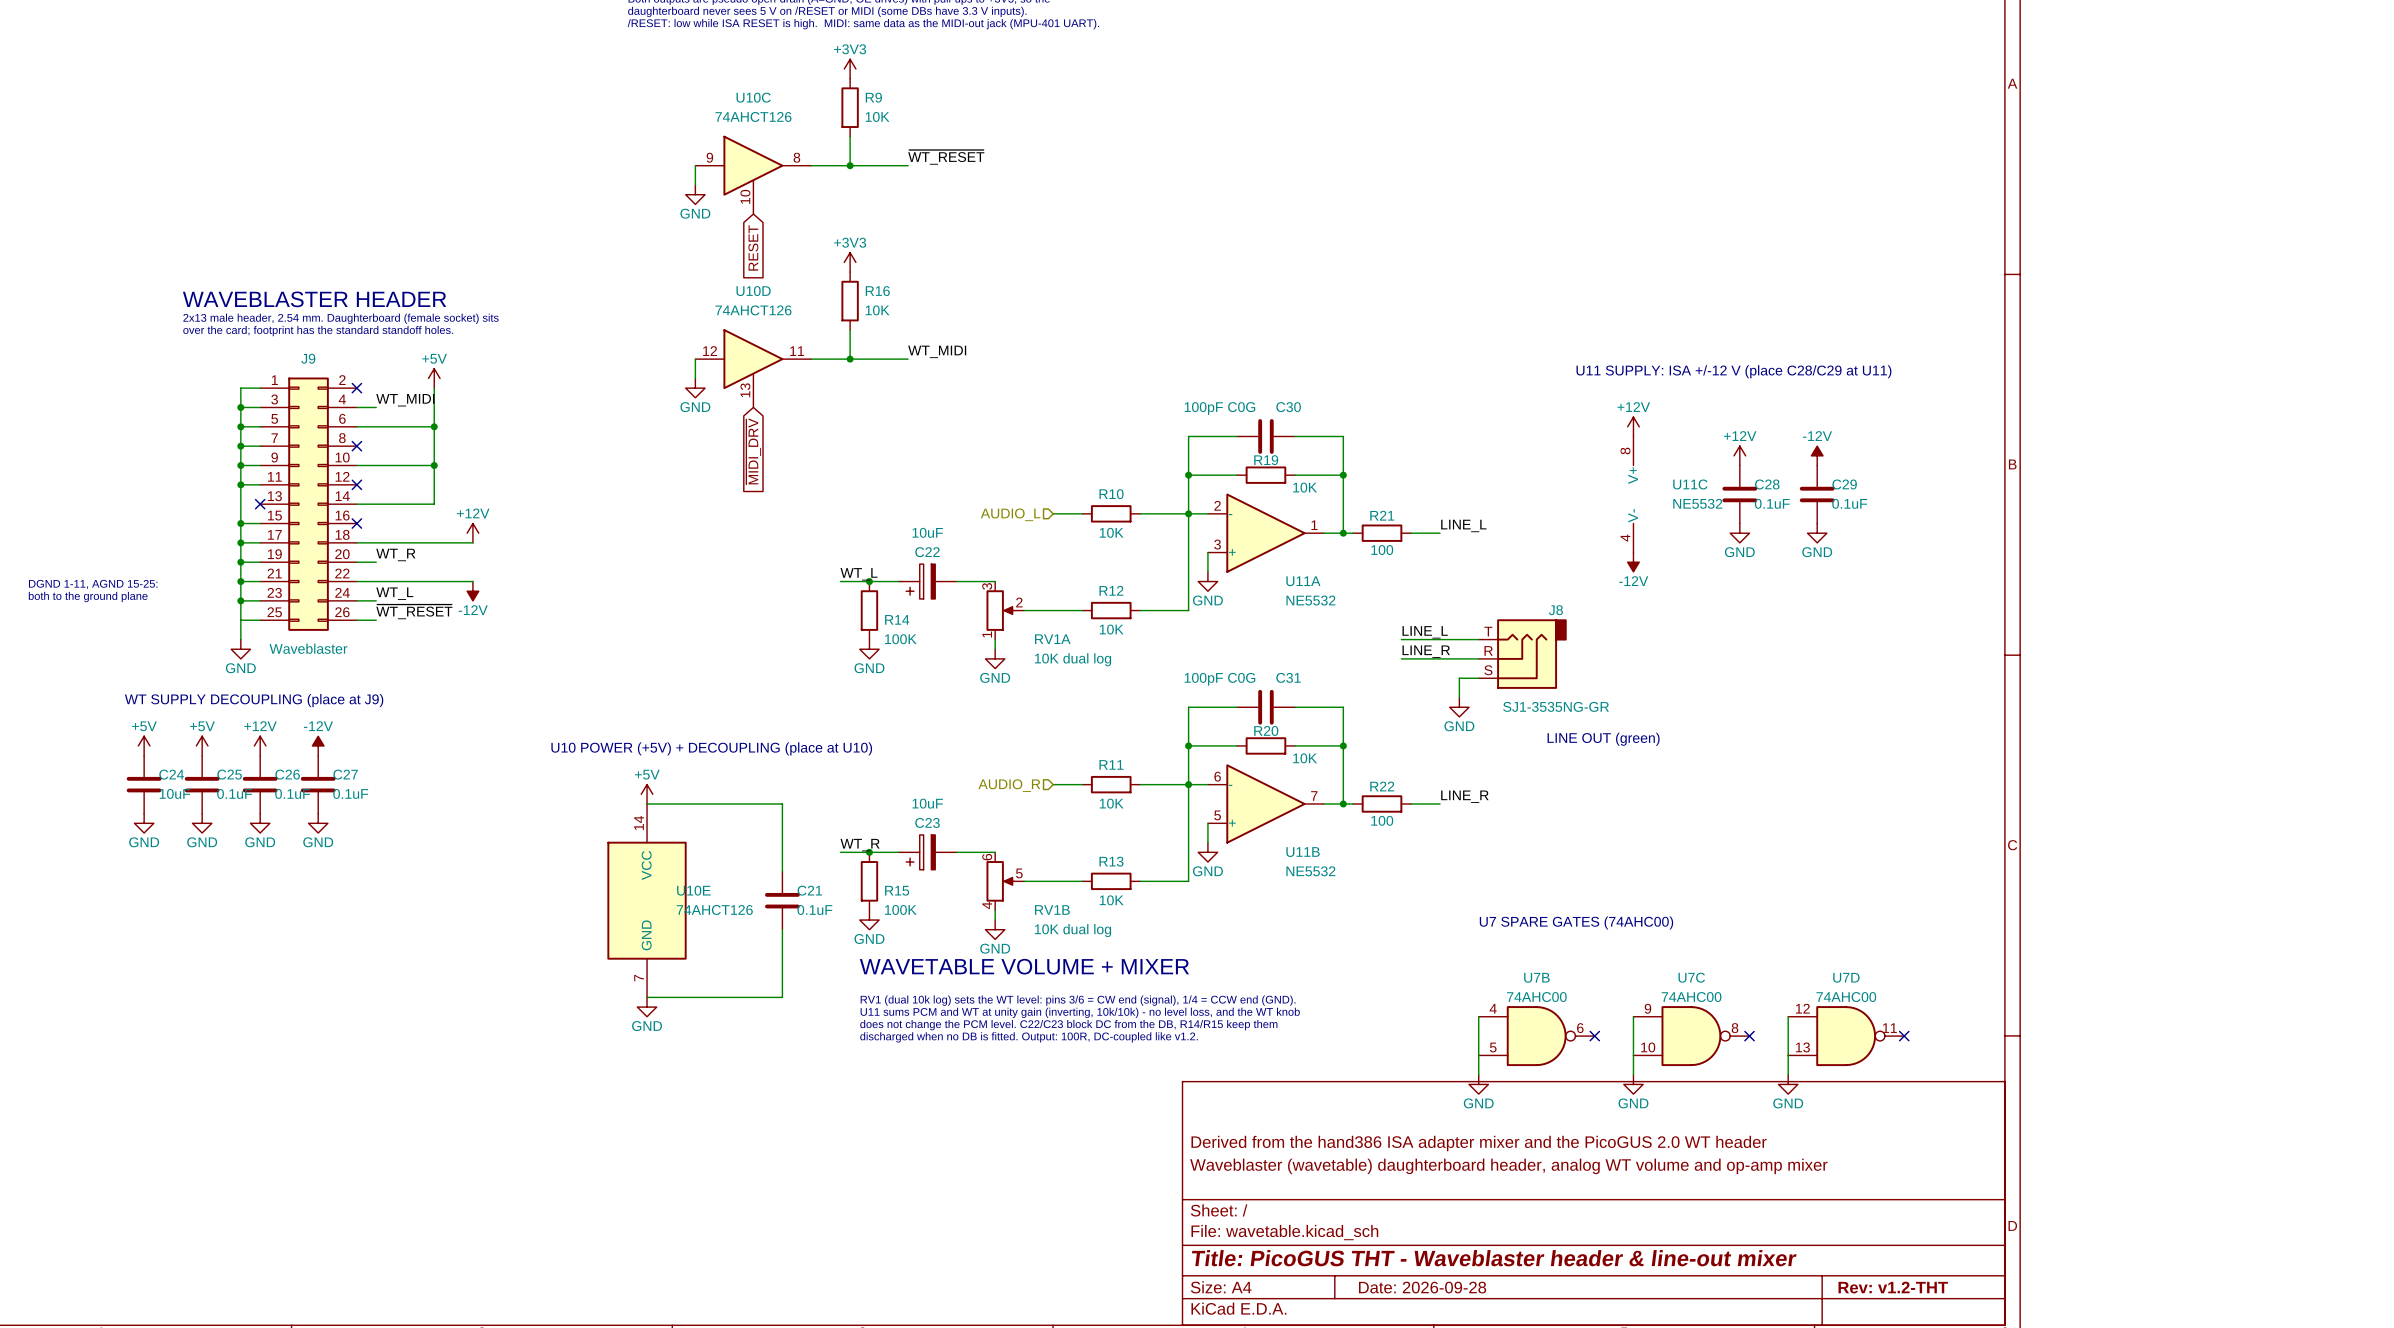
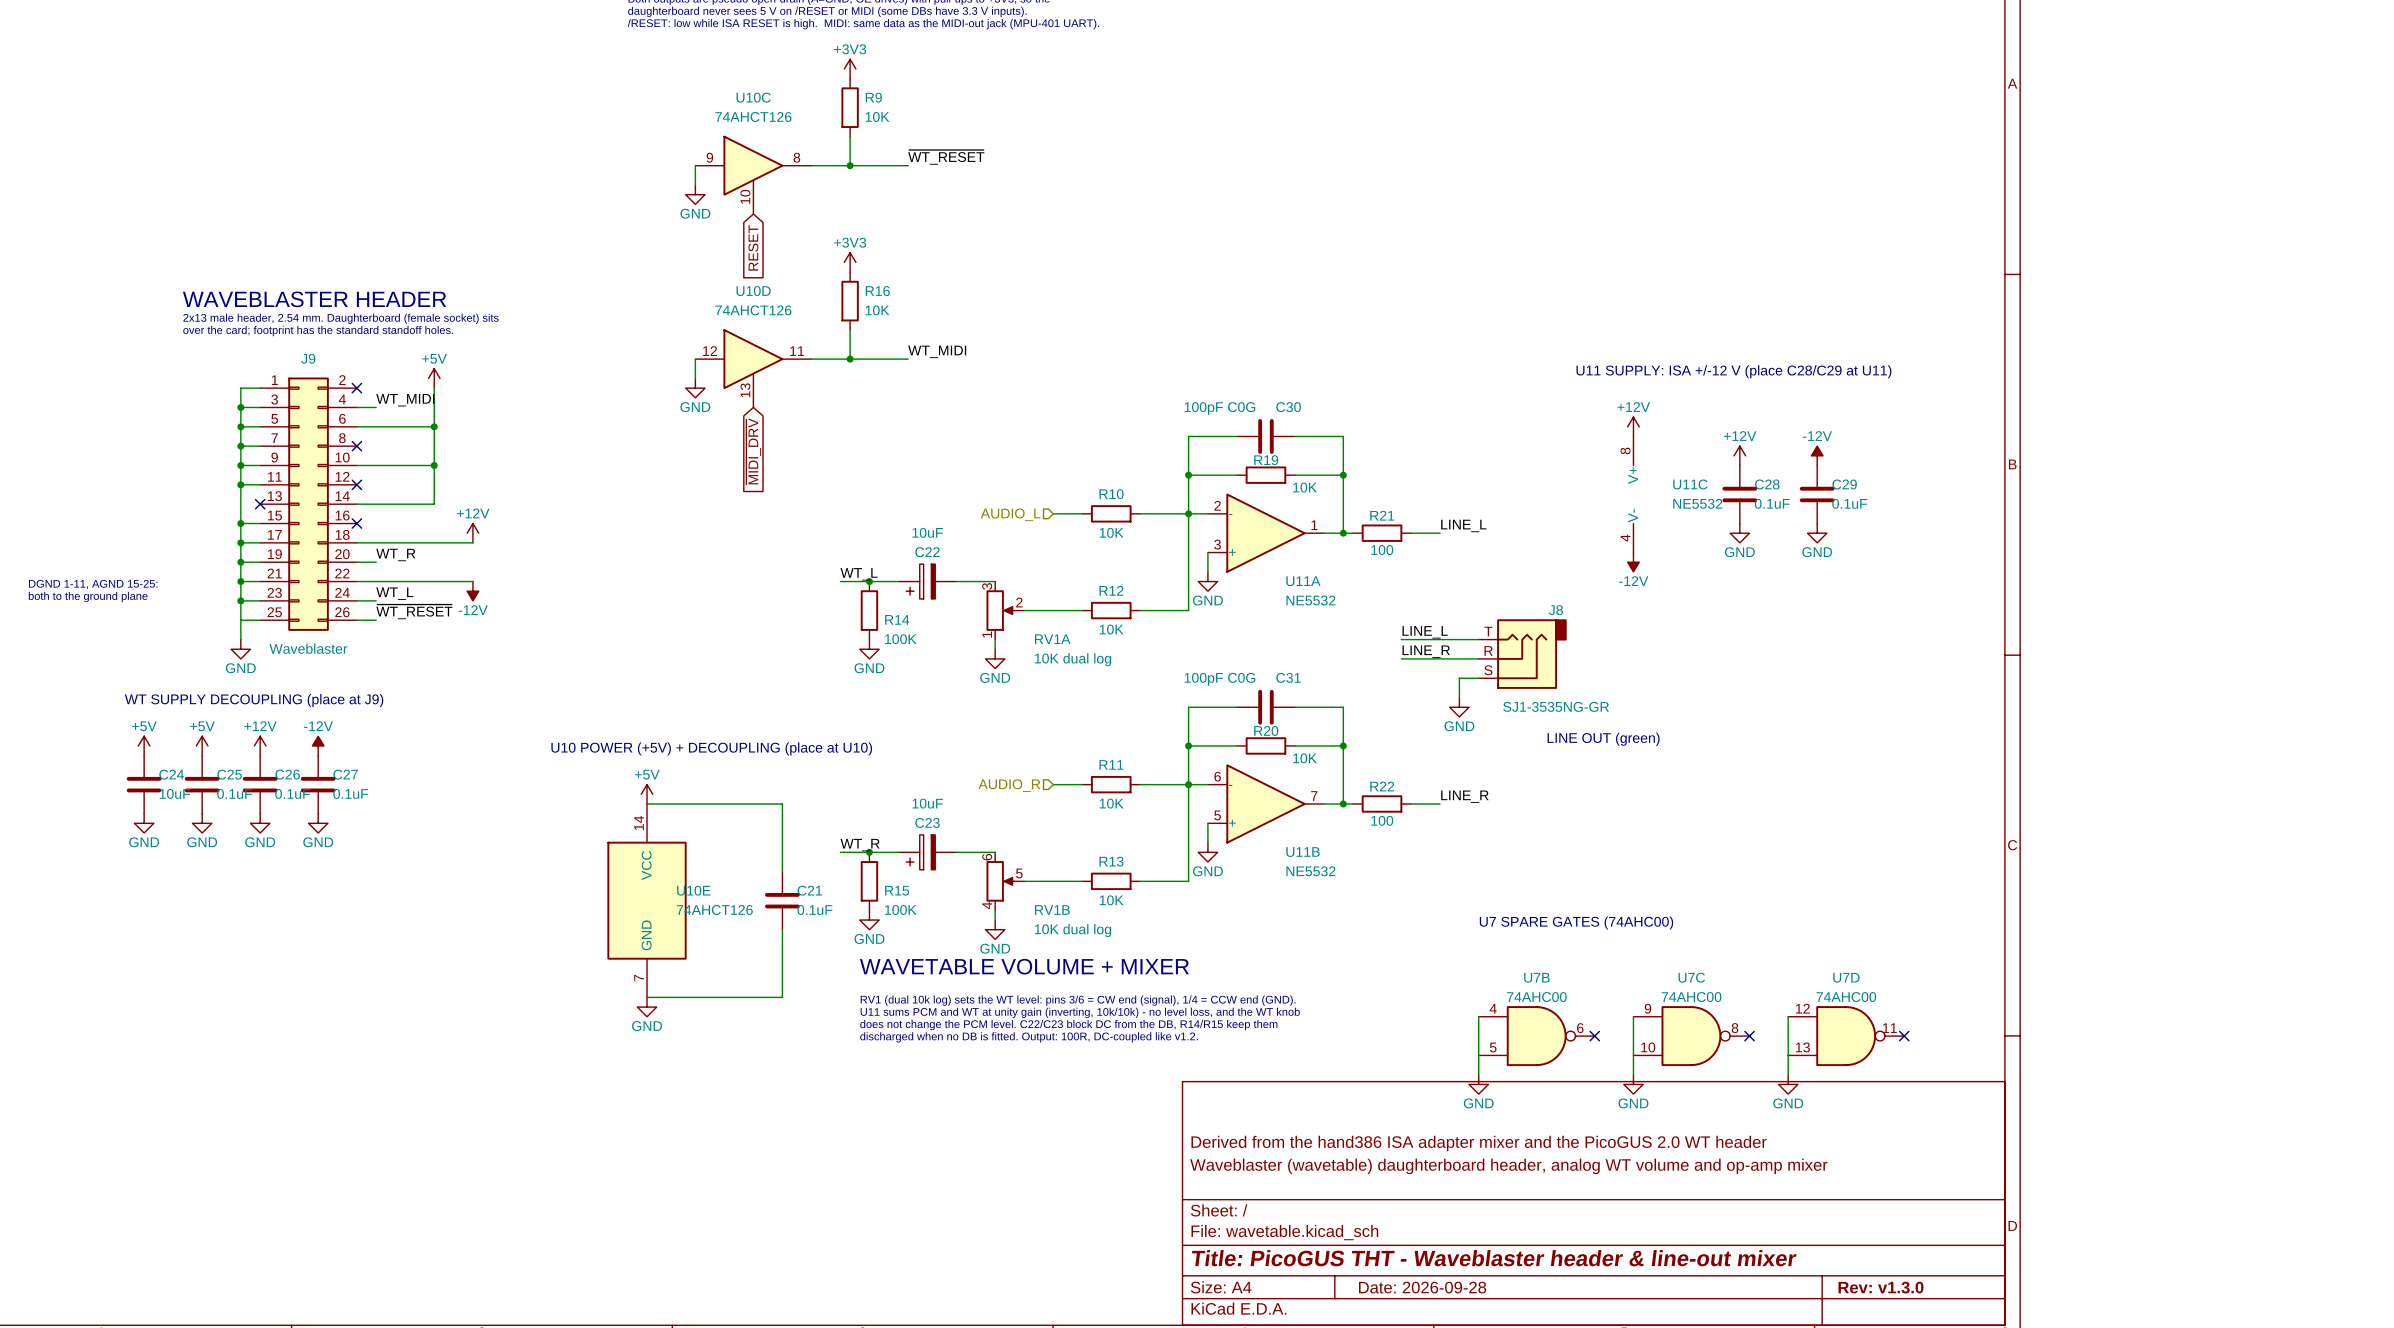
title block: Rev: v1.2-THT (1893, 1287) -> Rev: v1.3.0 (1880, 1287)

